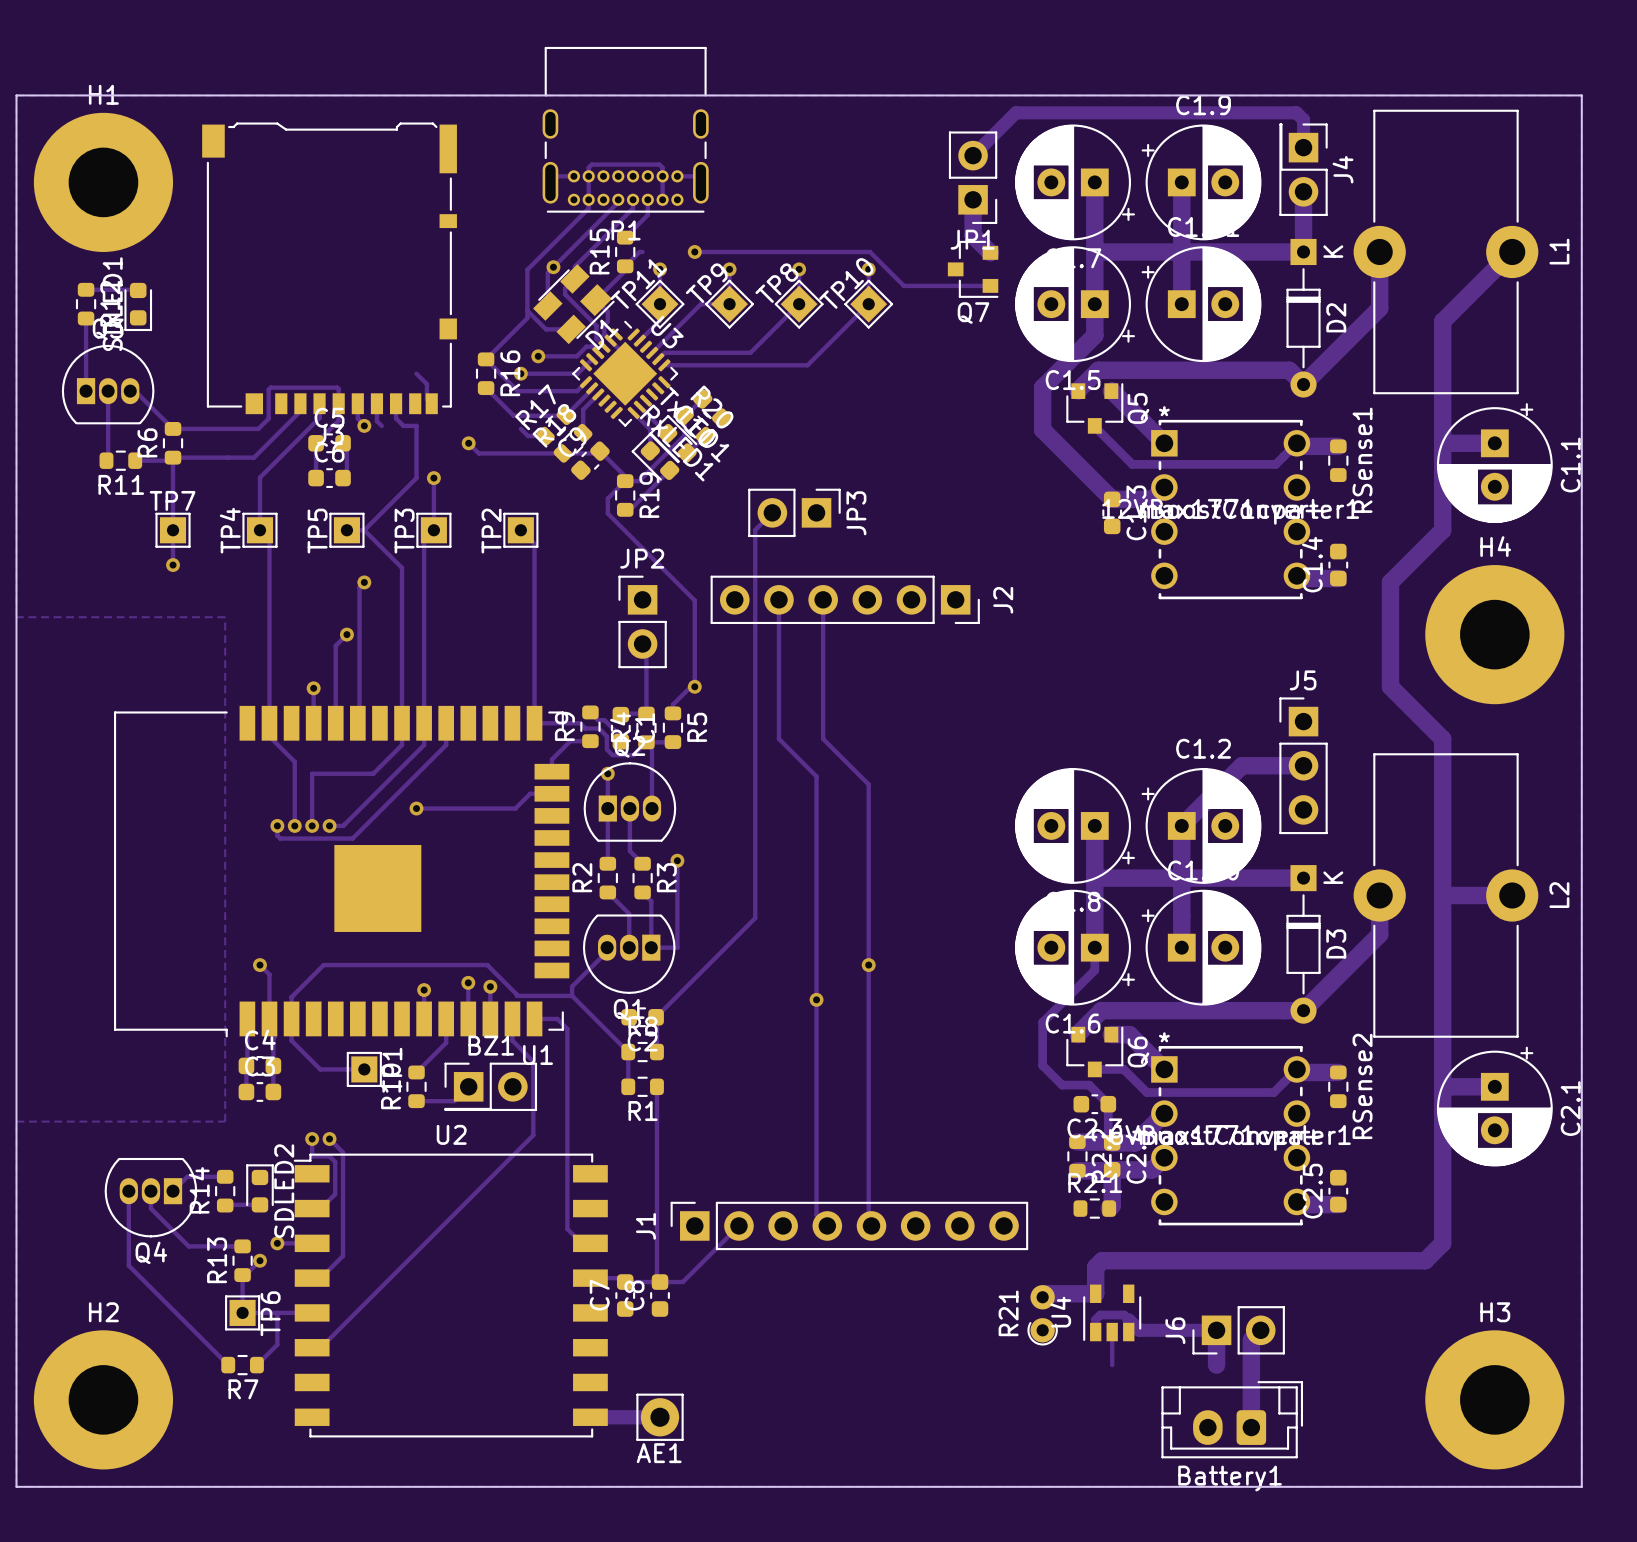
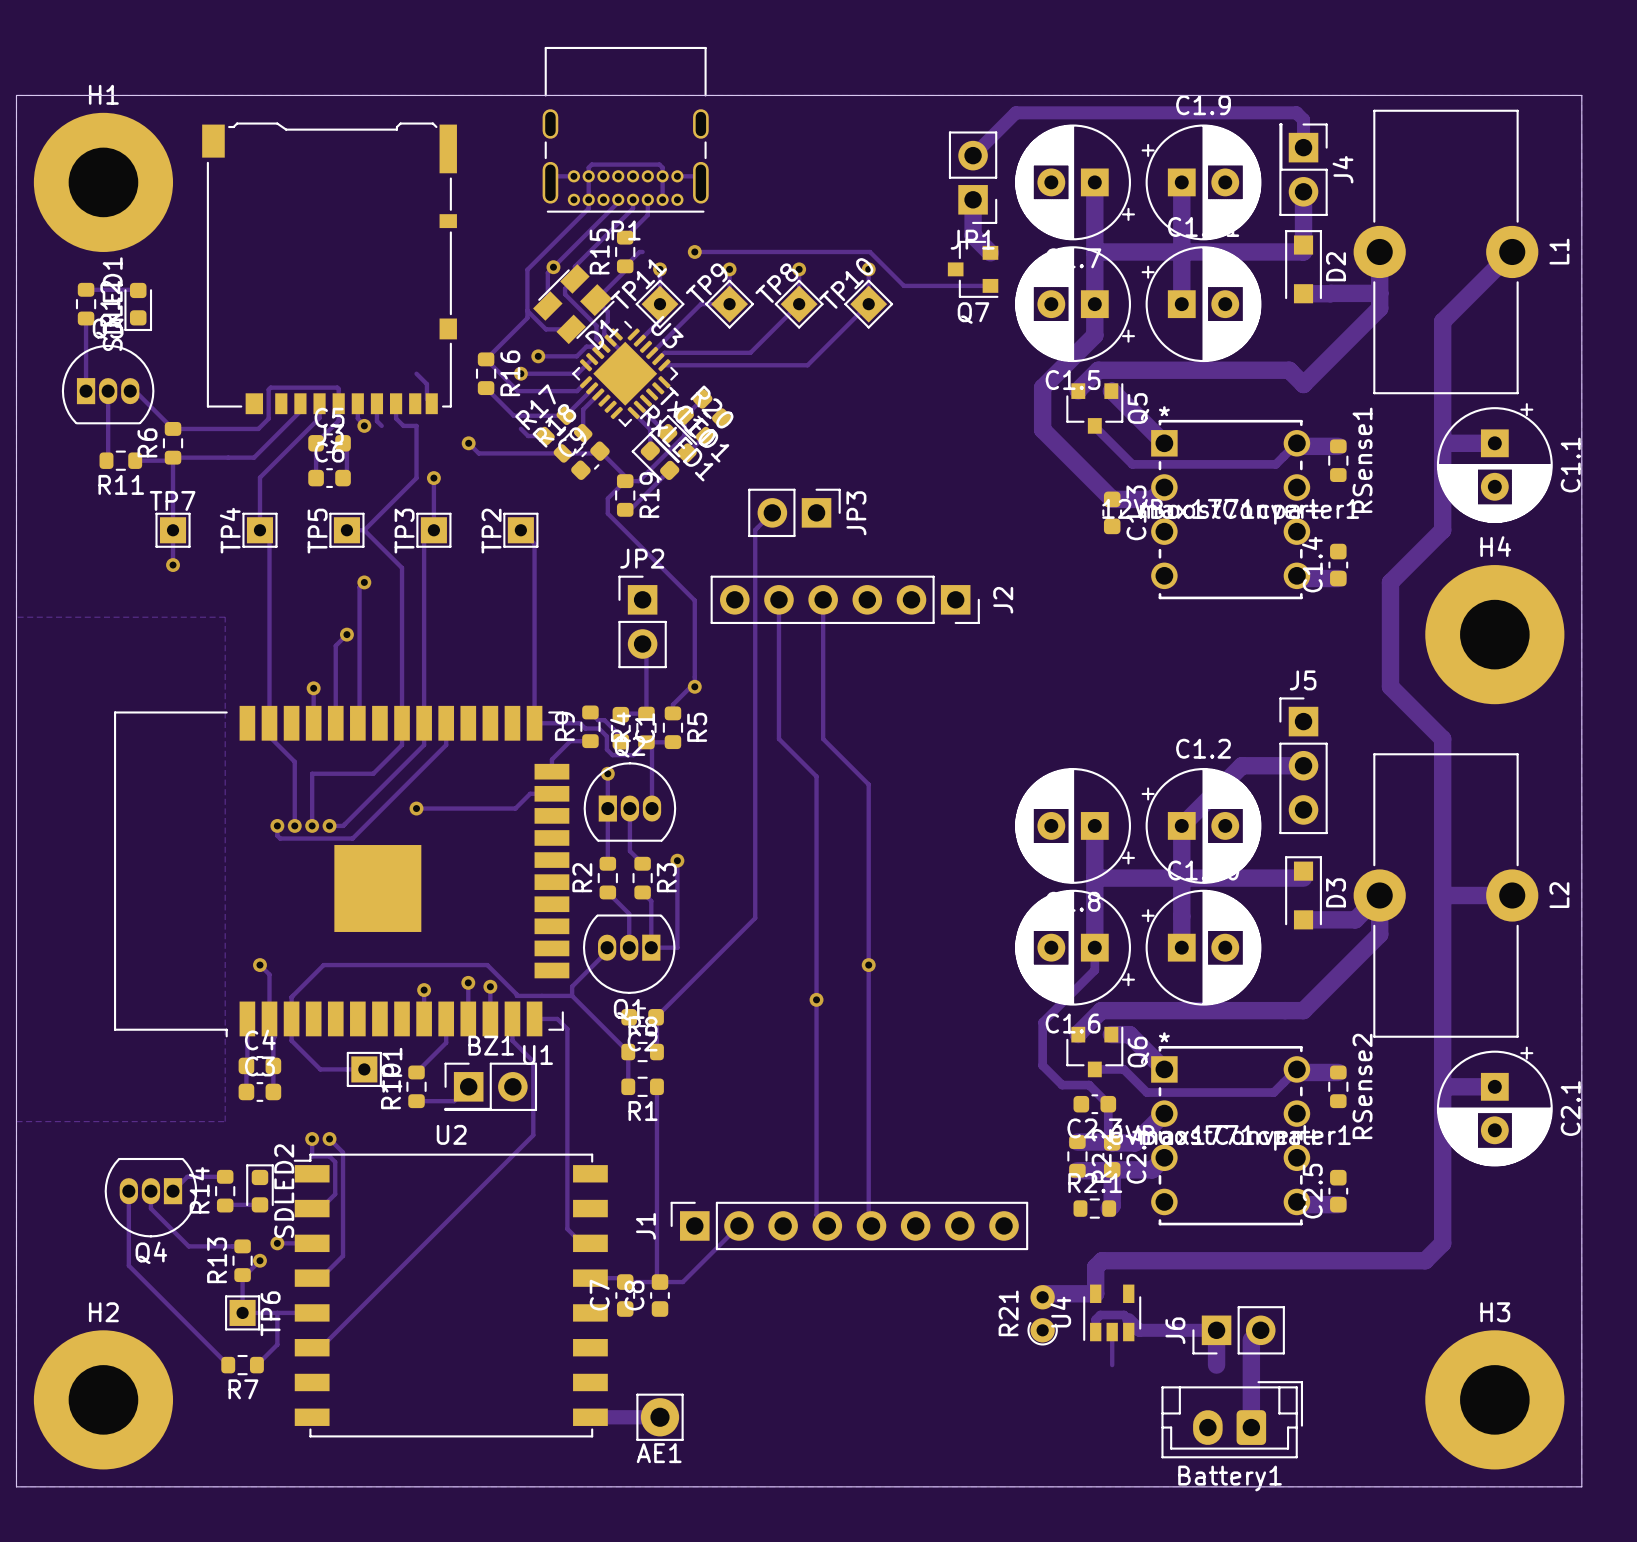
D2 footprint: [1286, 238, 1321, 398] -> [1285, 230, 1322, 304]
track: none -> (1379, 293) (1303, 293)
D3 footprint: [1286, 865, 1321, 1024] -> [1285, 856, 1322, 930]
track: none -> (1379, 895) (1355, 919) (1303, 919)

